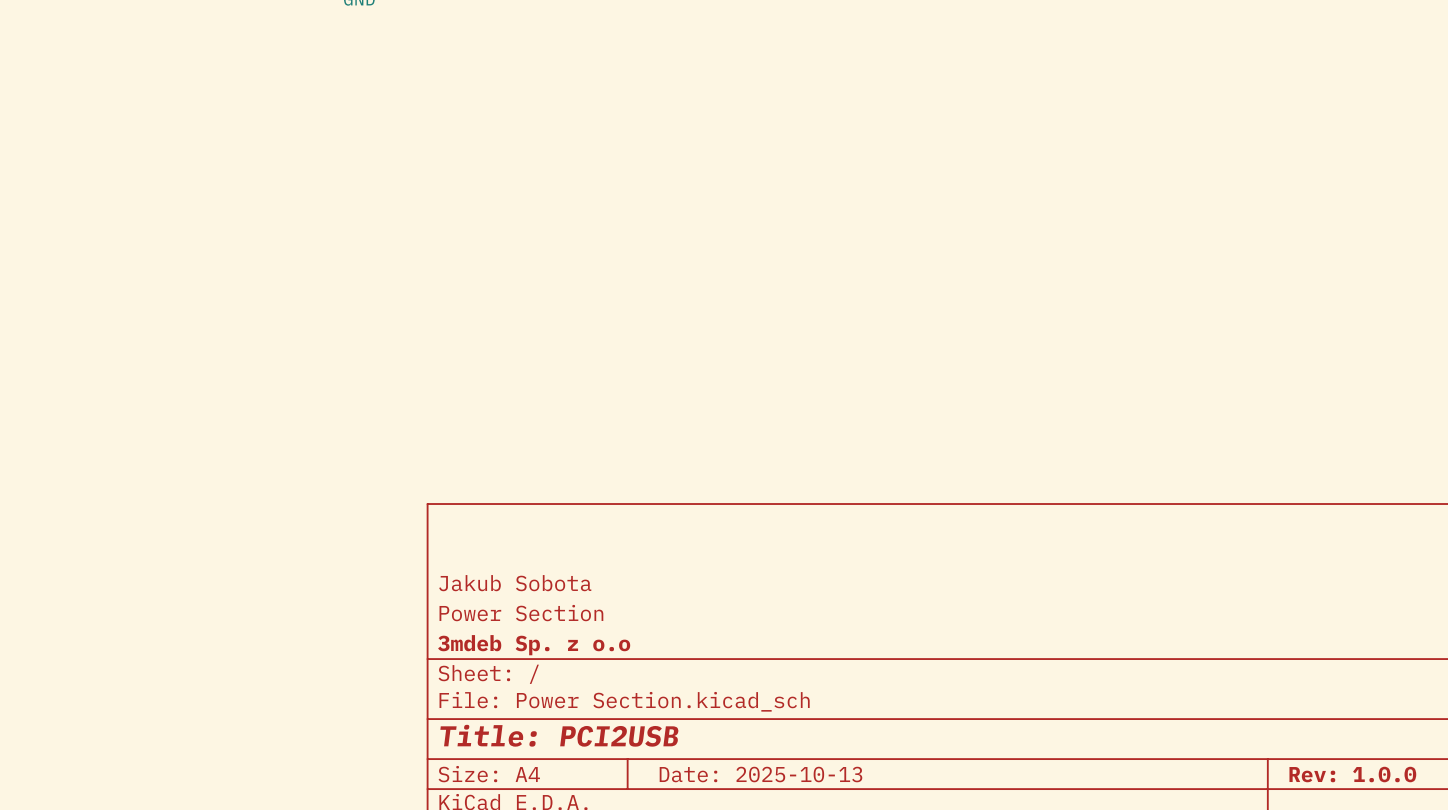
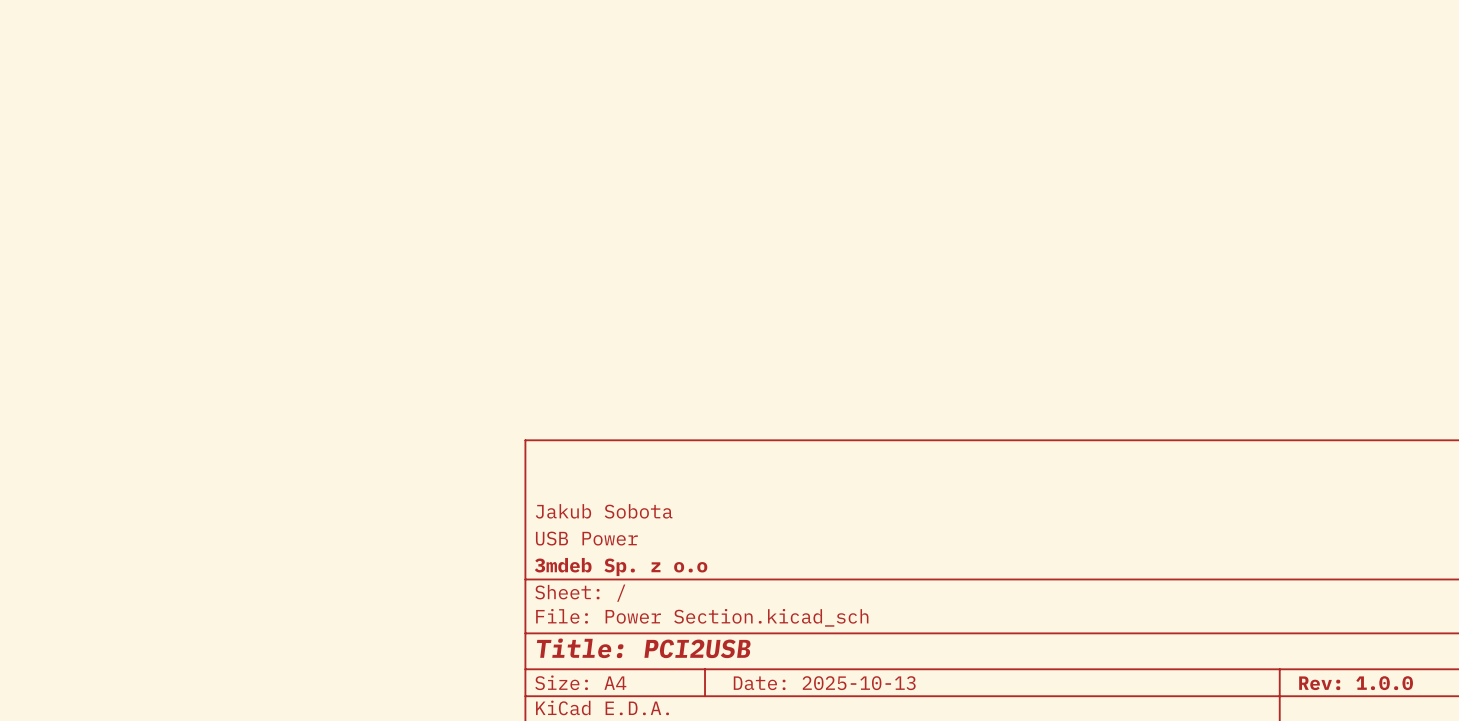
title block: Power Section (521, 613) -> USB Power (586, 538)

